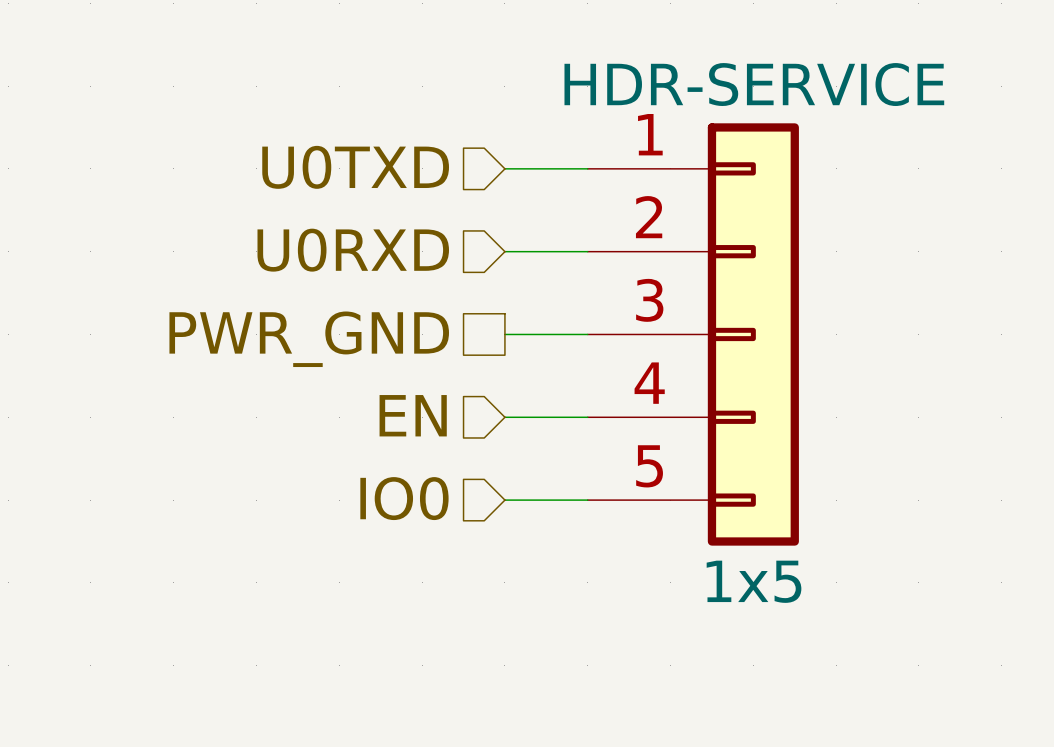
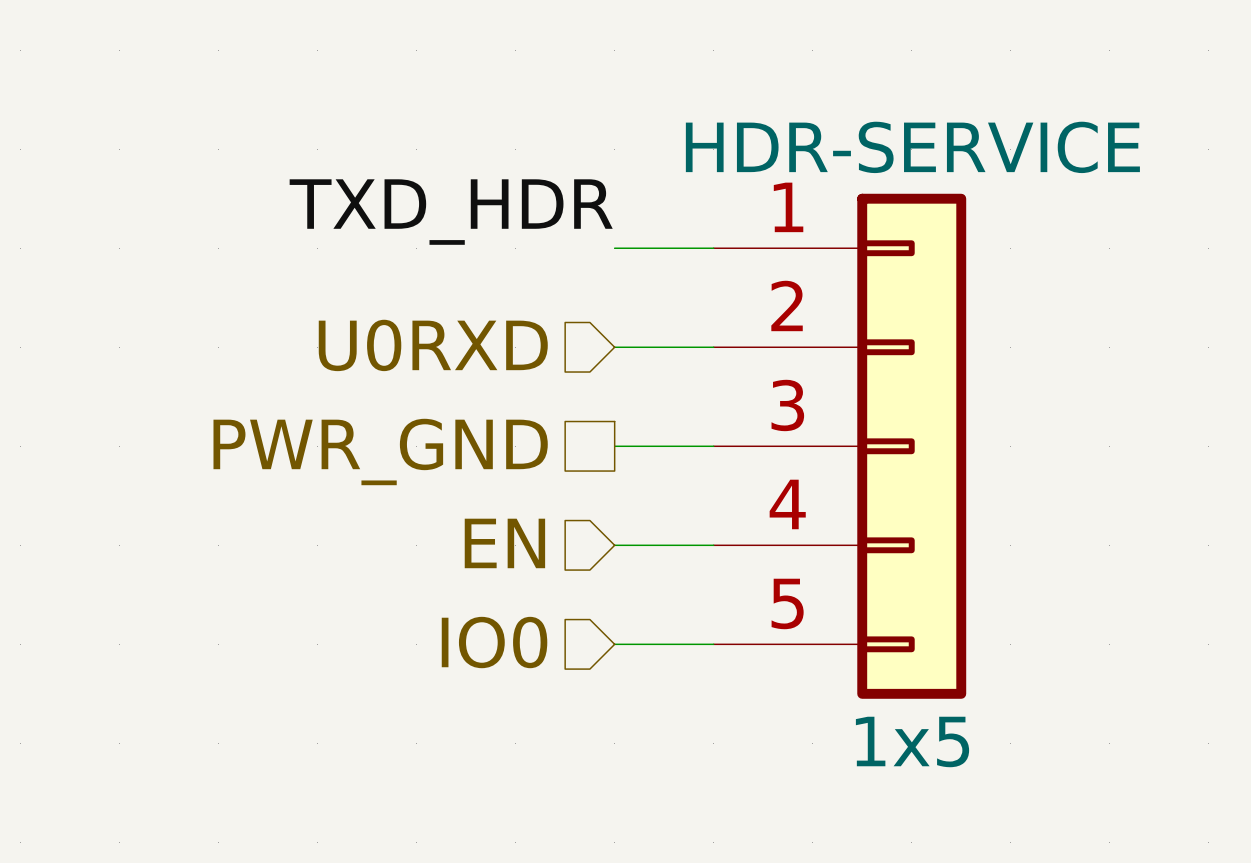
label: none -> TXD_HDR (451, 212)
hierarchical label: U0TXD (355, 167) -> none

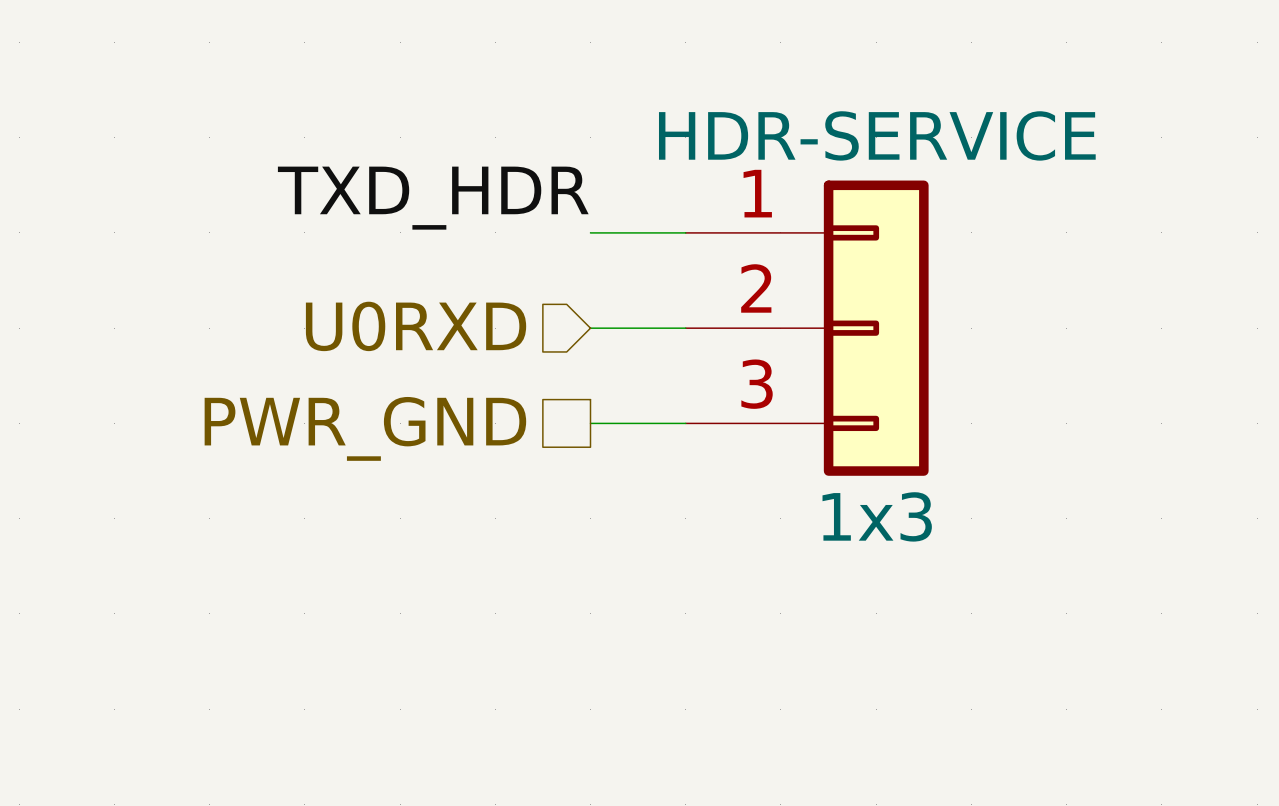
HDR-SERVICE: none -> 1x3 (807, 328)
HDR-SERVICE: 1x5 (839, 446) -> none
hierarchical label: EN (504, 543) -> none
wire: (614, 545) (713, 545) -> none
hierarchical label: IO0 (494, 642) -> none
wire: (614, 644) (713, 644) -> none

